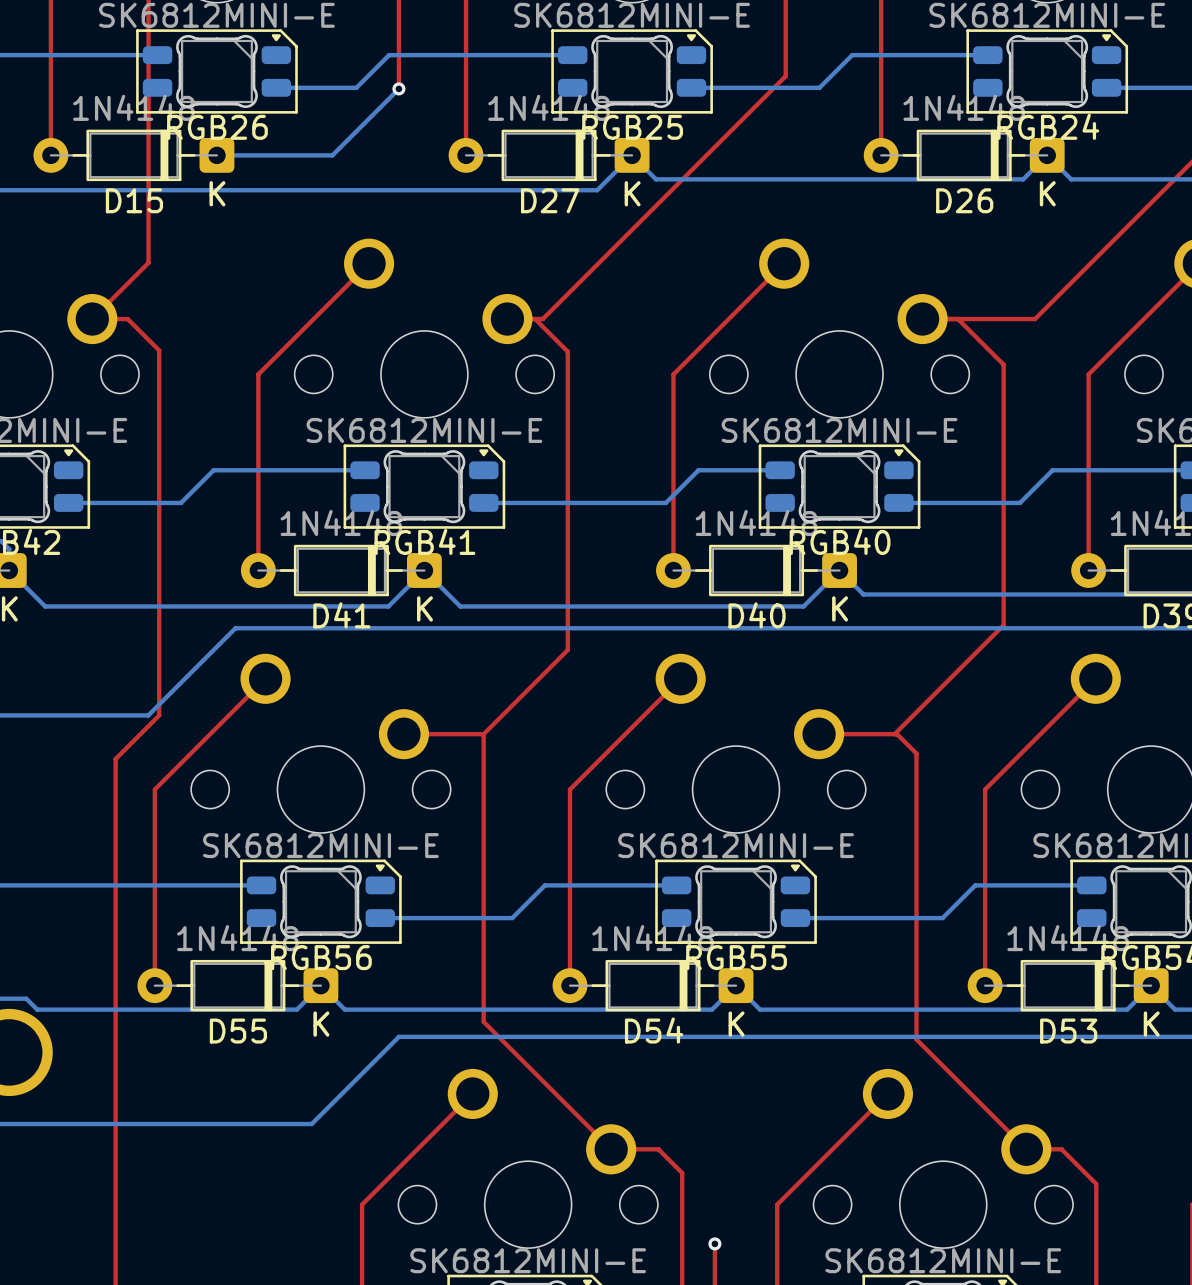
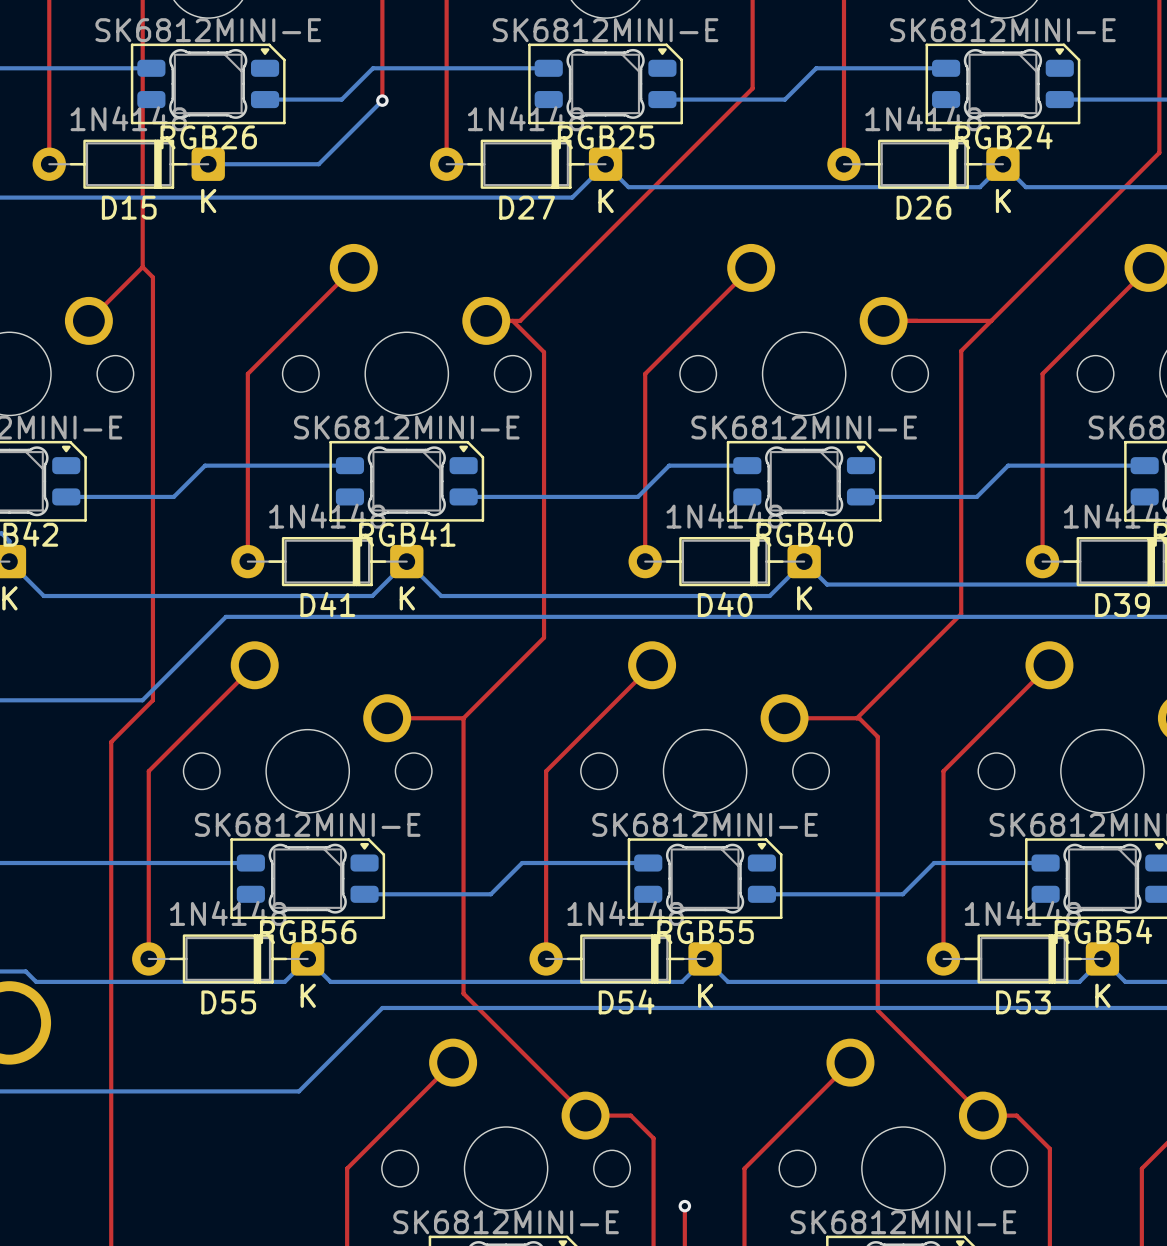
top track: (92, 319) (127, 319) (159, 350) -> (142, 267) (152, 277) (152, 351)
top track: (958, 319) (1003, 364) -> (991, 320) (961, 350) (961, 364)

